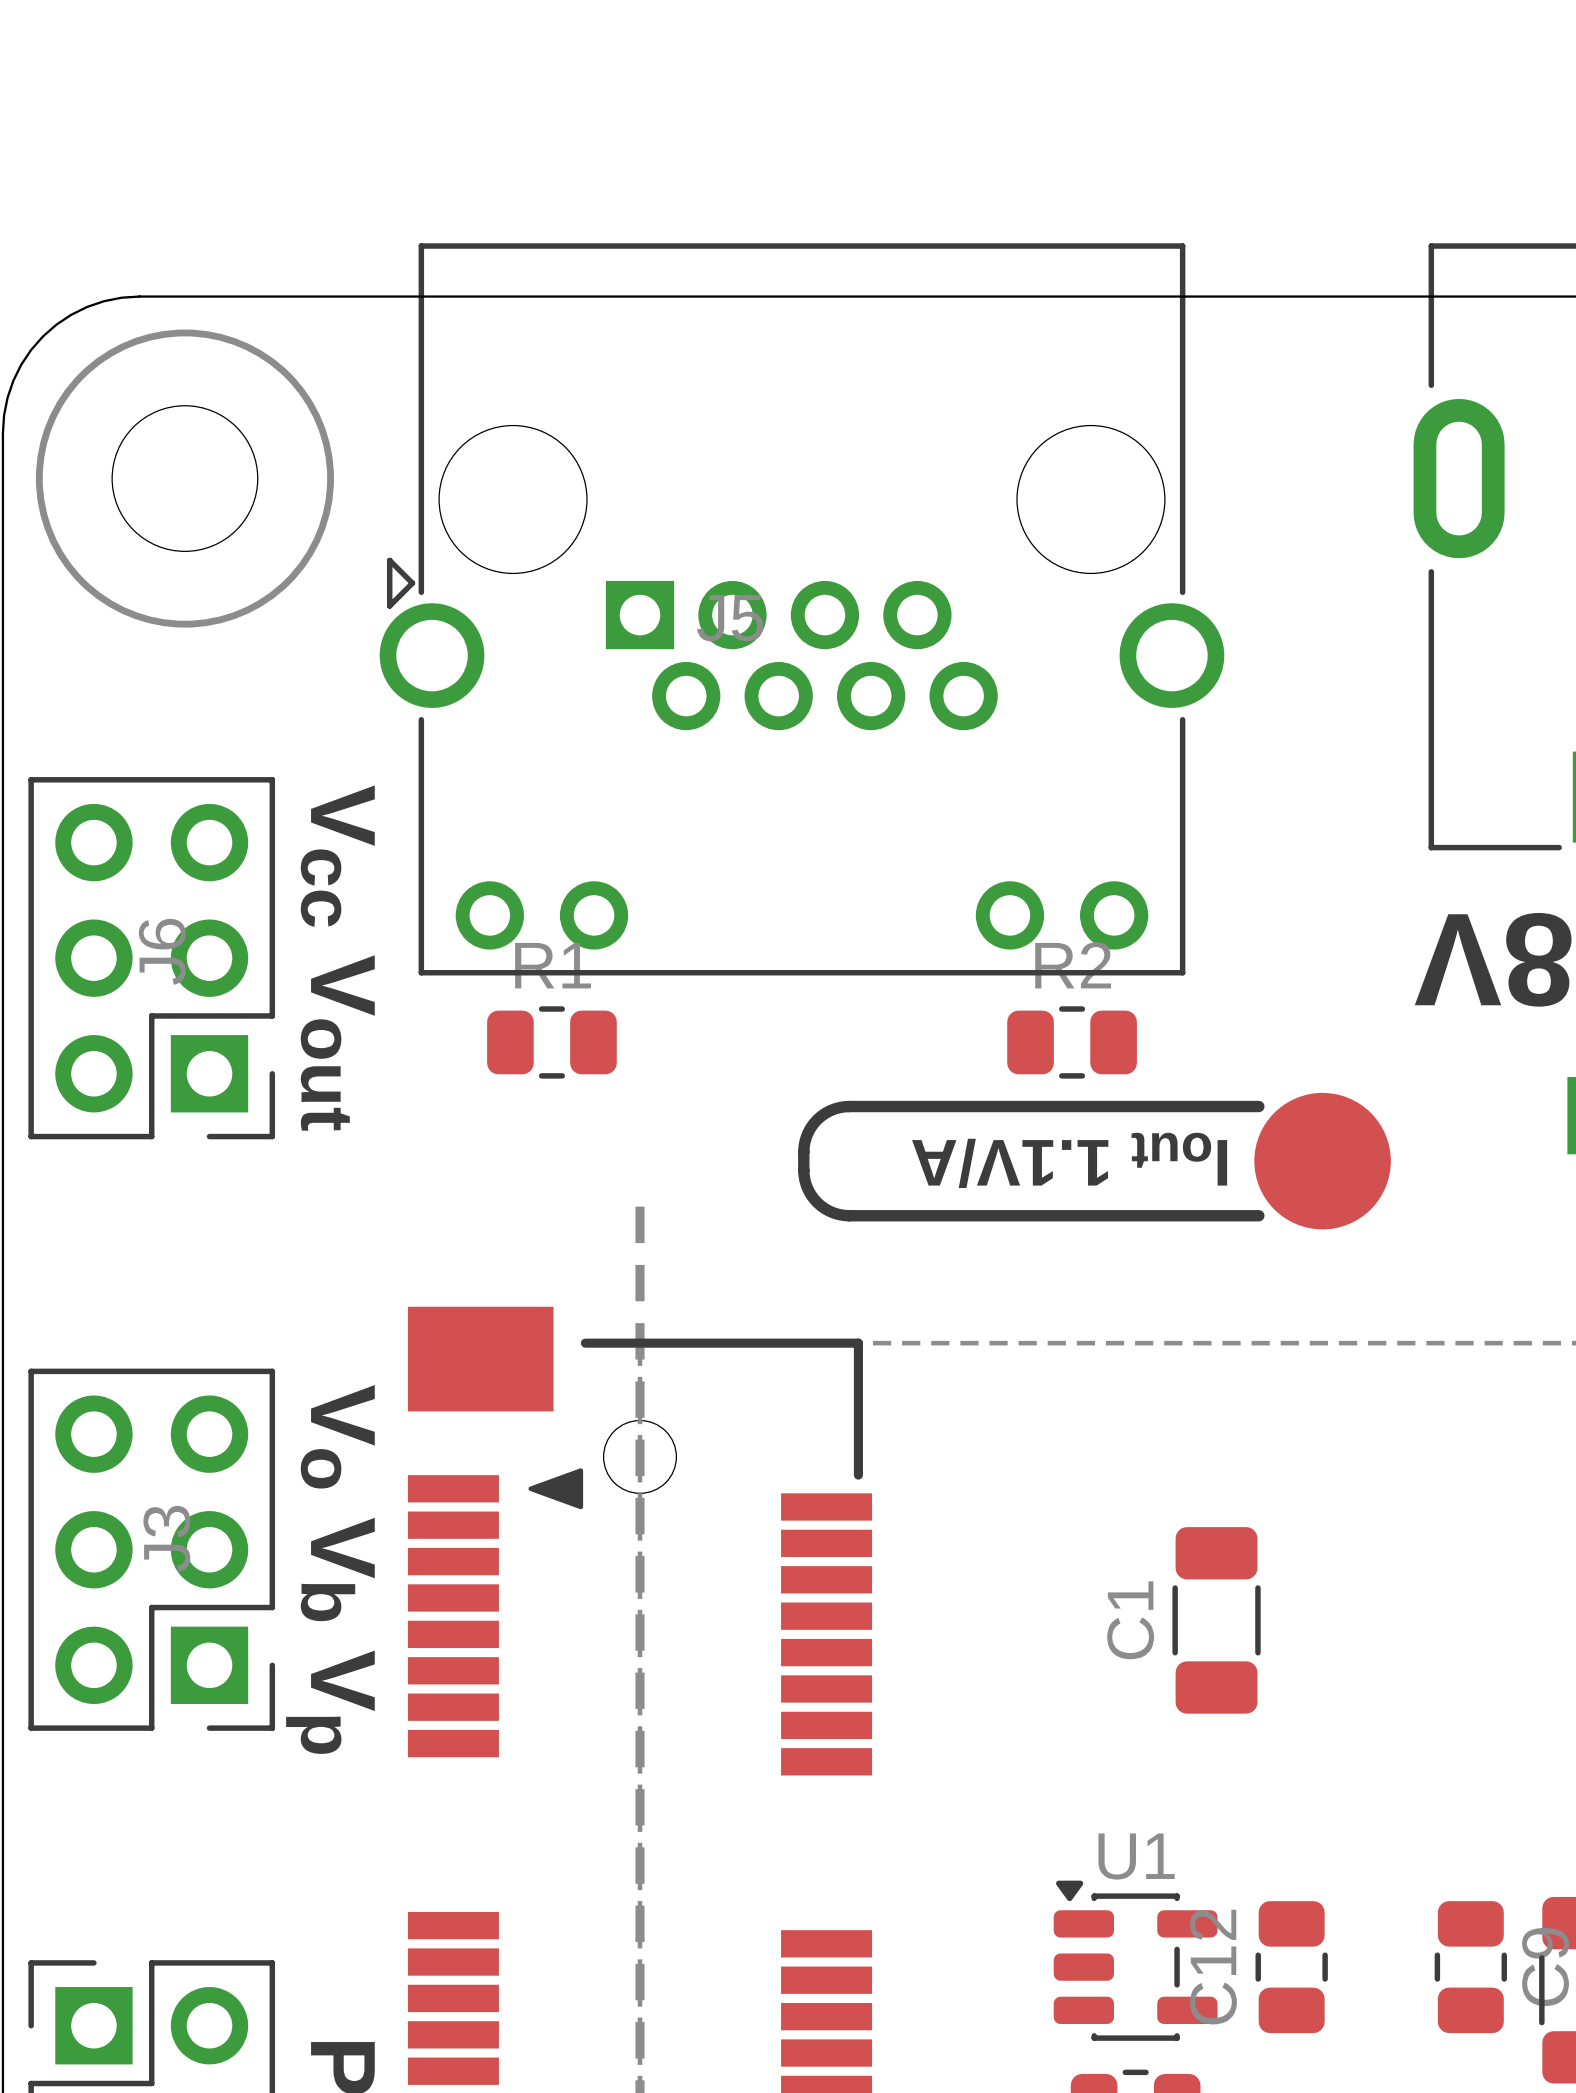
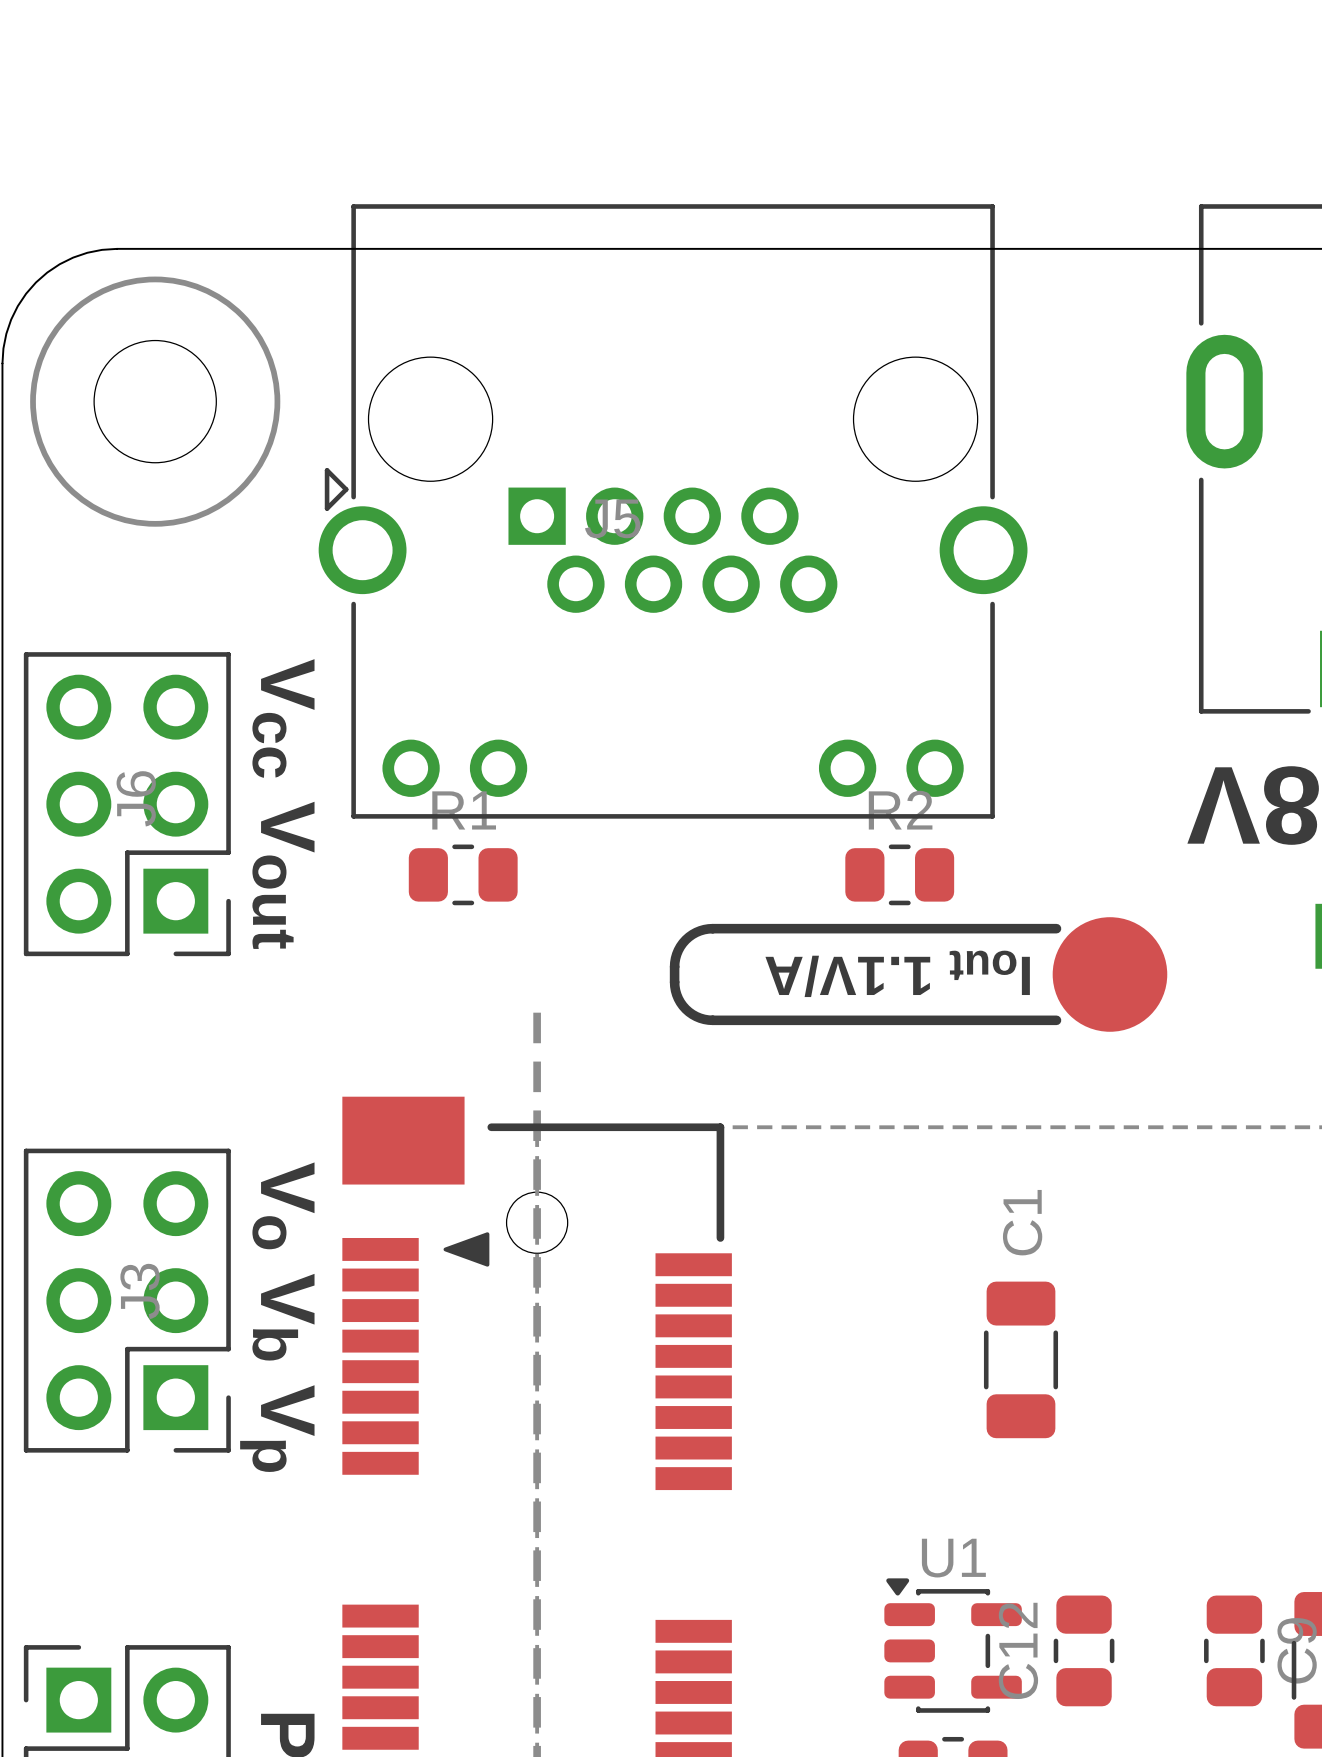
C1 name position: C1 (1130, 1620) -> C1 (1022, 1222)

